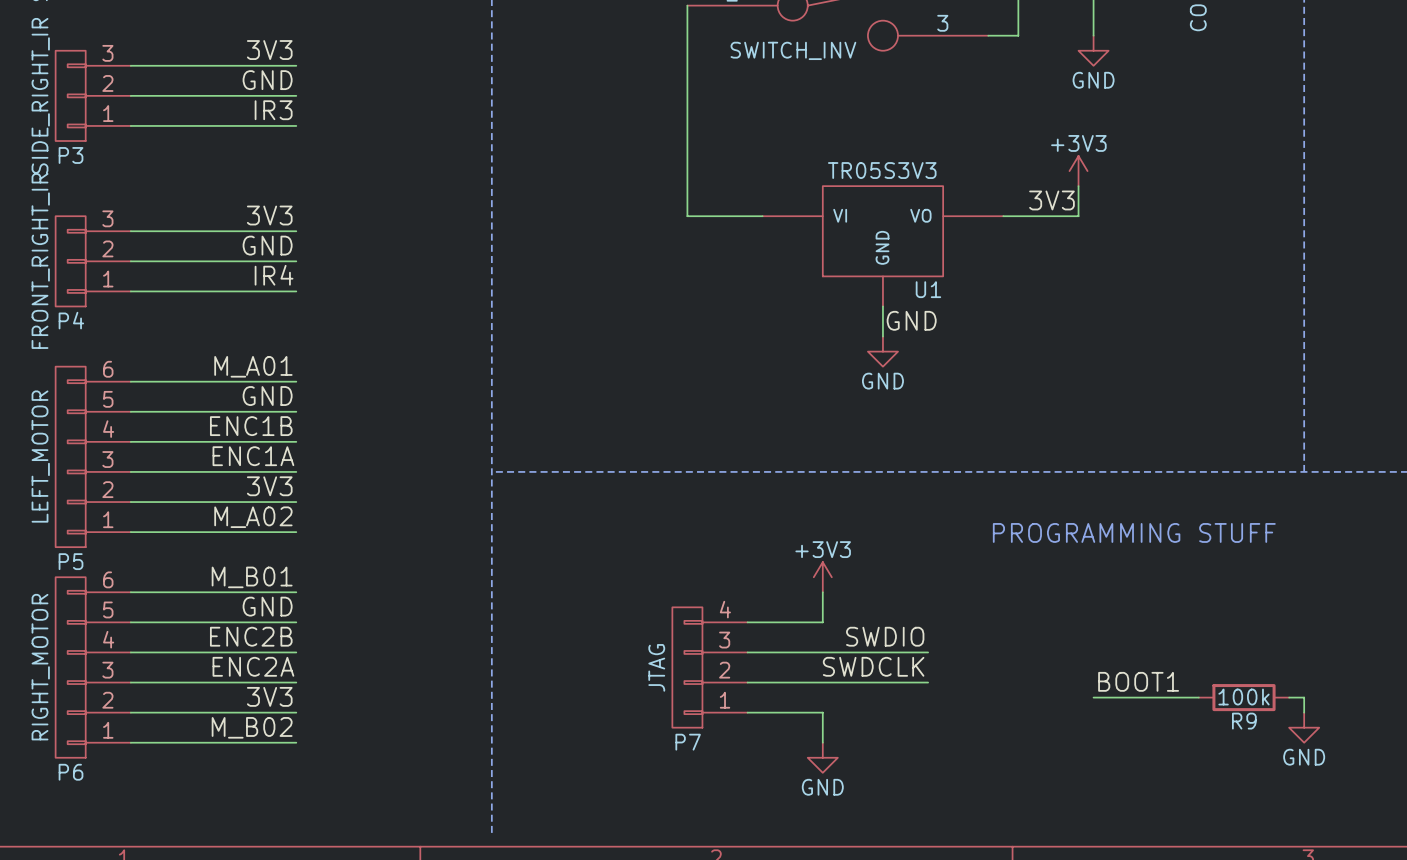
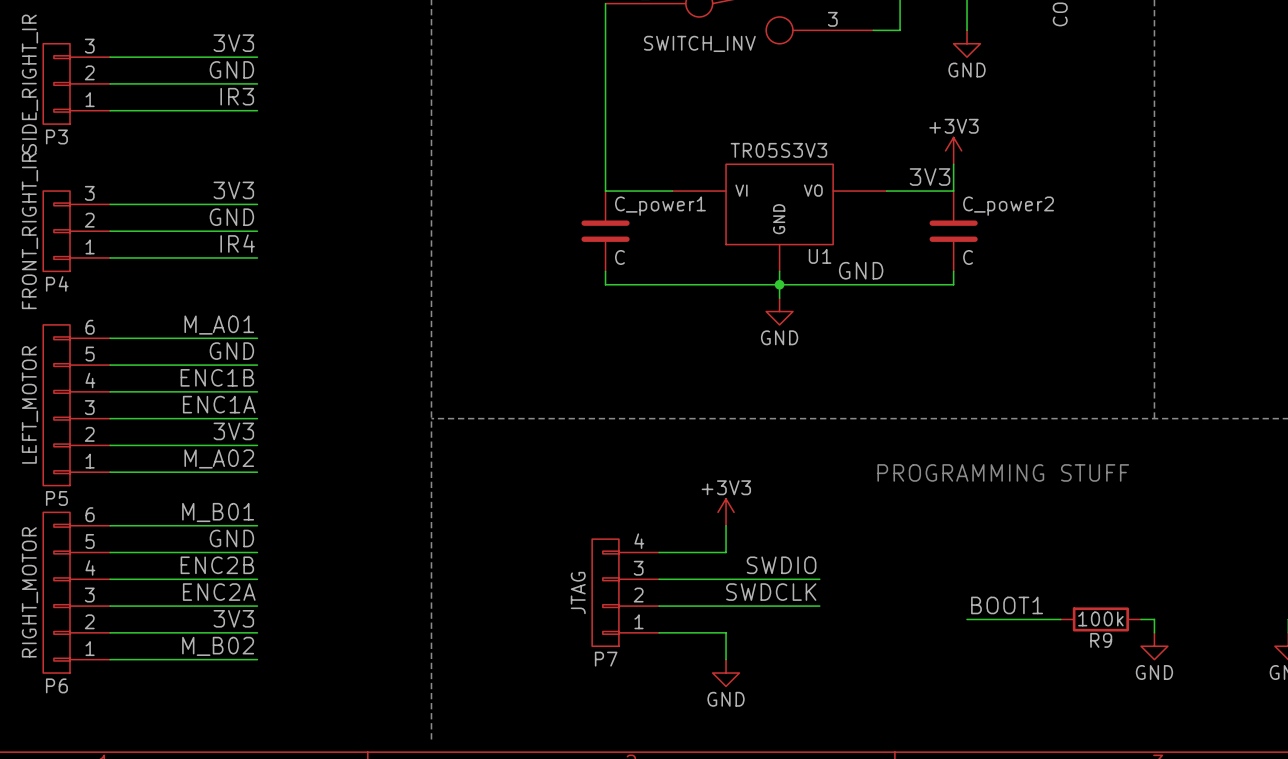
C_power1: none -> C (605, 231)
C_power2: none -> C (953, 231)
wire: none -> (605, 271) (605, 284) (953, 284) (953, 271)
label position: GND (911, 320) -> GND (861, 270)
junction: none -> (779, 284)

